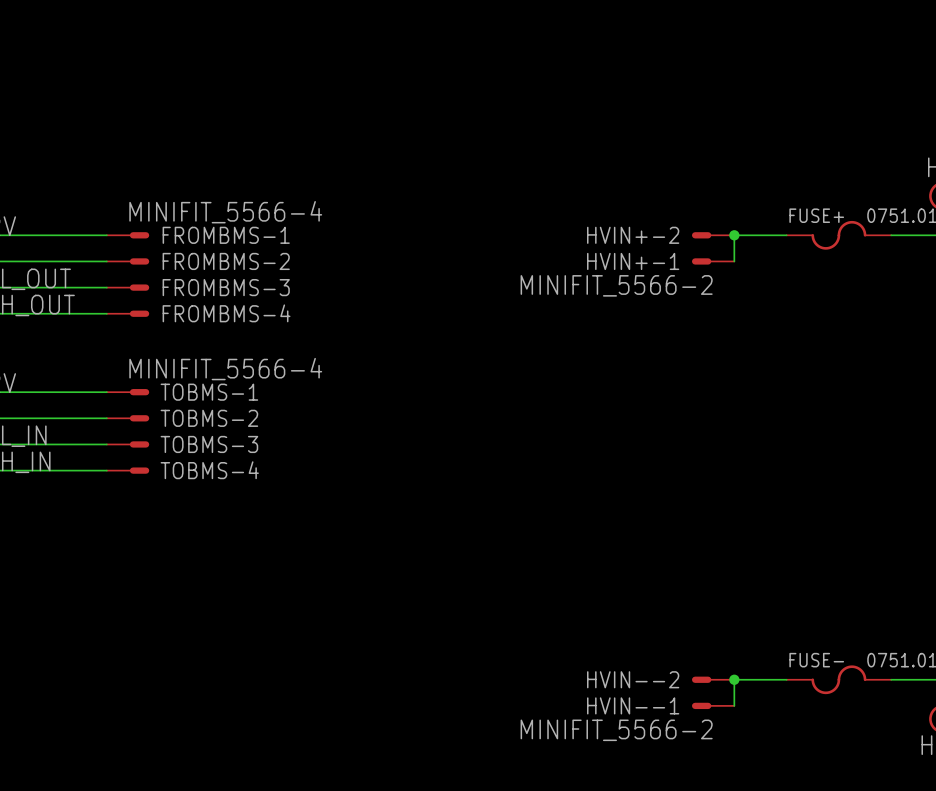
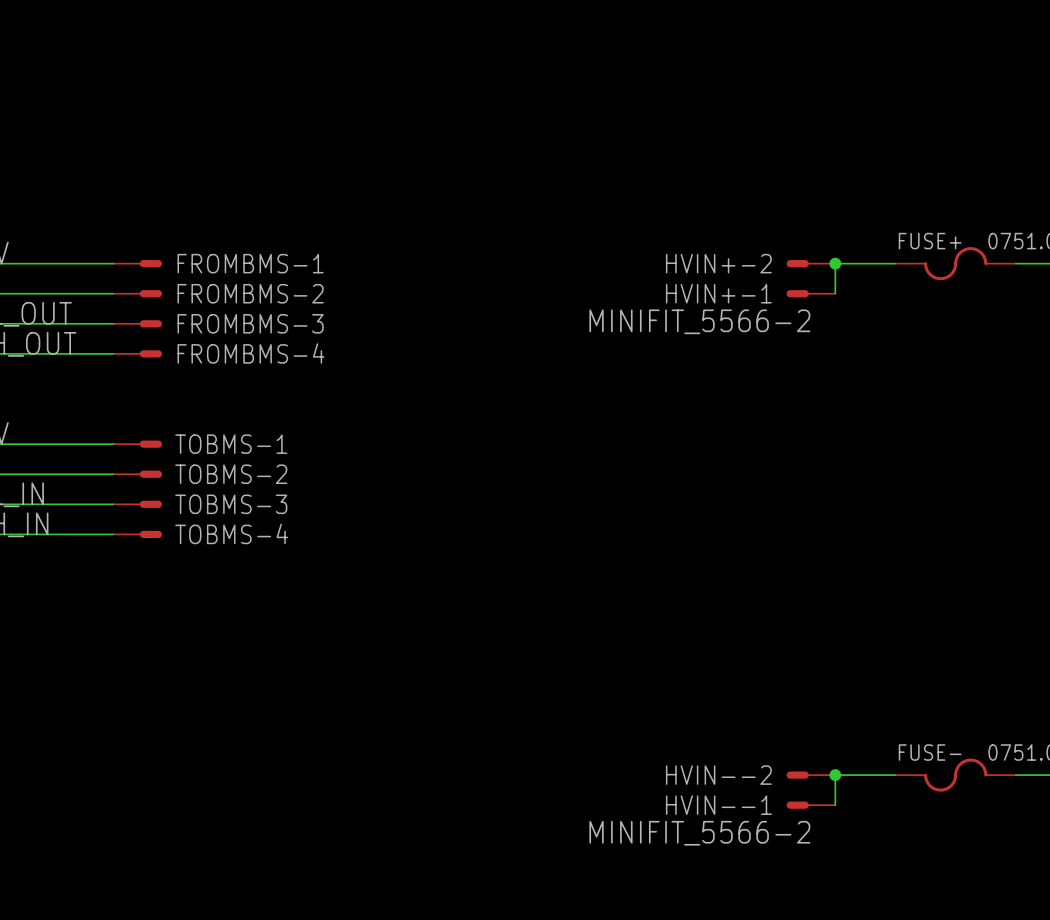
FROMBMS-1 value: MINIFIT_5566-4 (225, 212) -> none
TOBMS-1 value: MINIFIT_5566-4 (225, 369) -> none

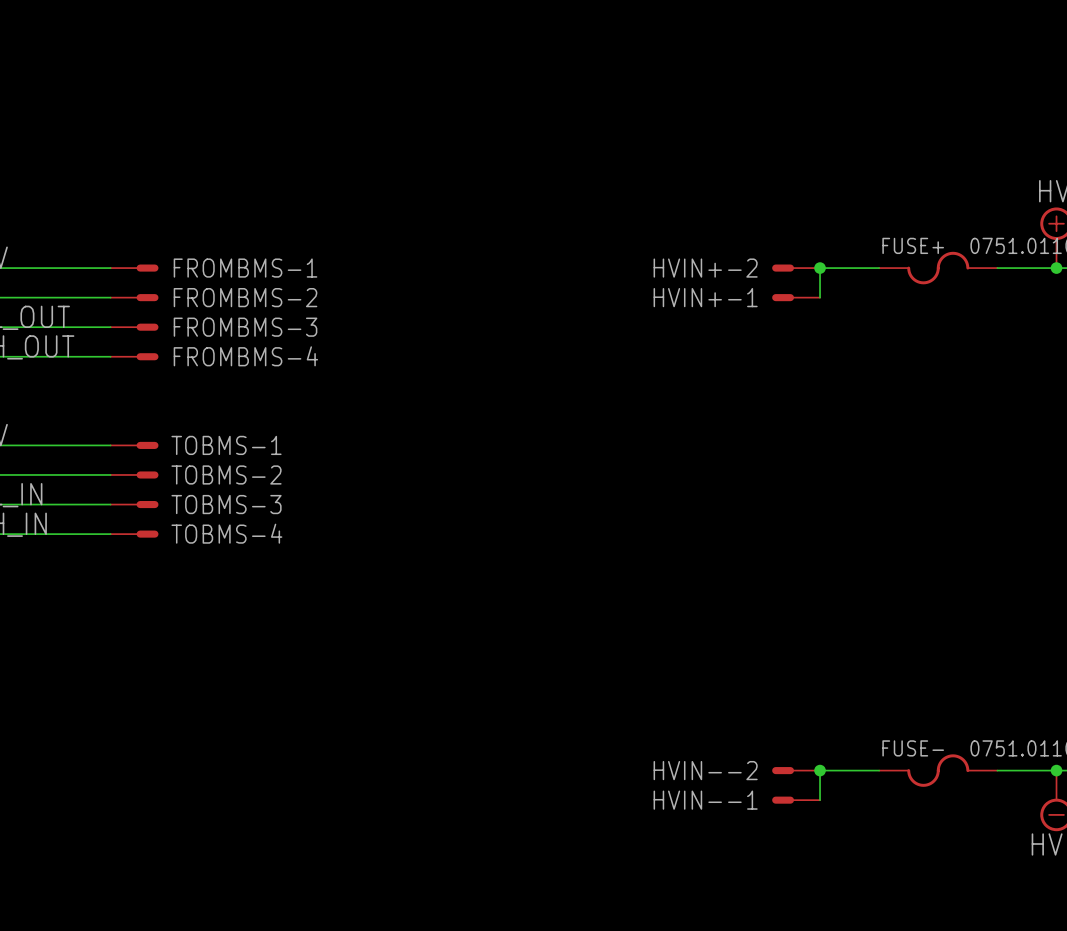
HVIN+-1 value: MINIFIT_5566-2 (699, 321) -> none
HVIN--1 value: MINIFIT_5566-2 (699, 833) -> none

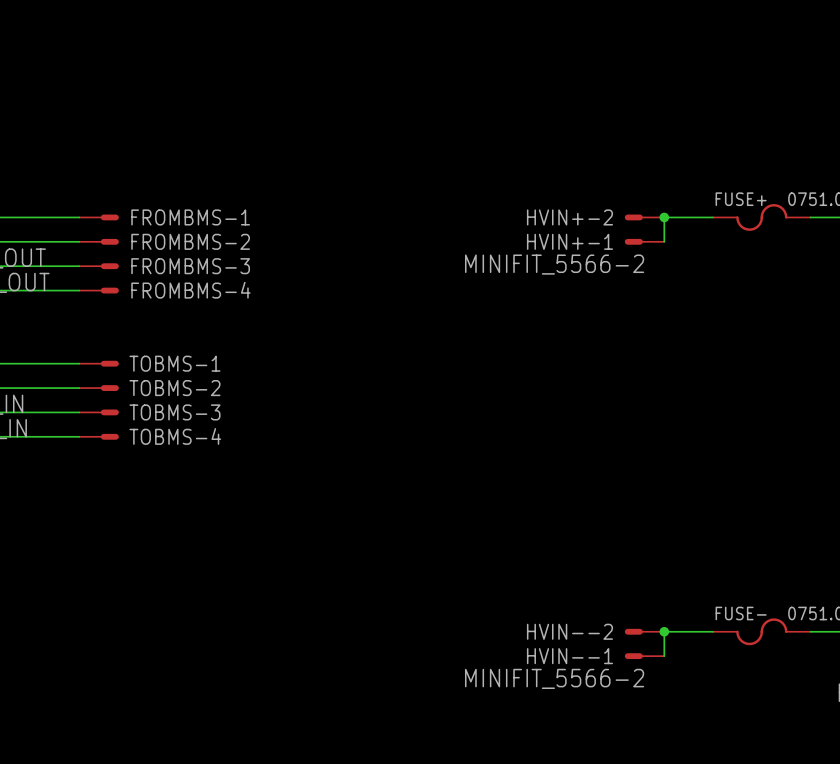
HVIN+-1 value: none -> MINIFIT_5566-2 (554, 264)
HVIN--1 value: none -> MINIFIT_5566-2 (554, 678)

